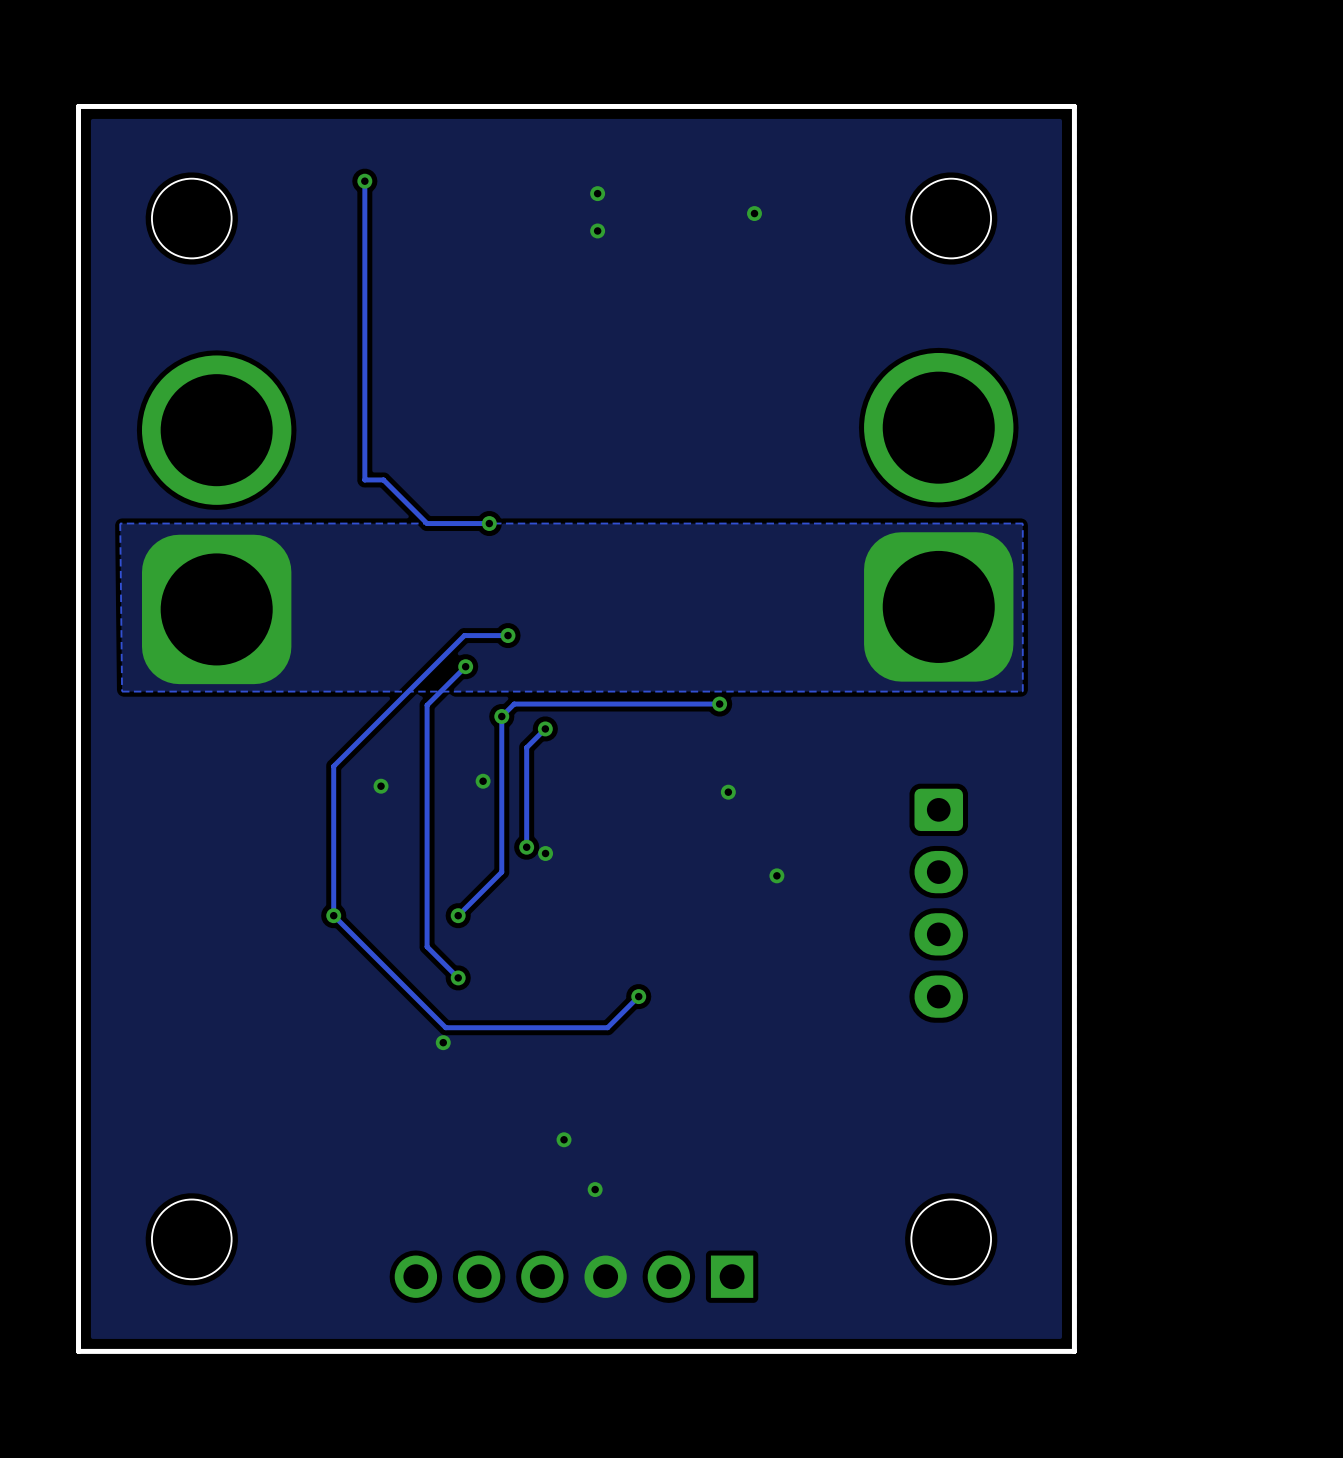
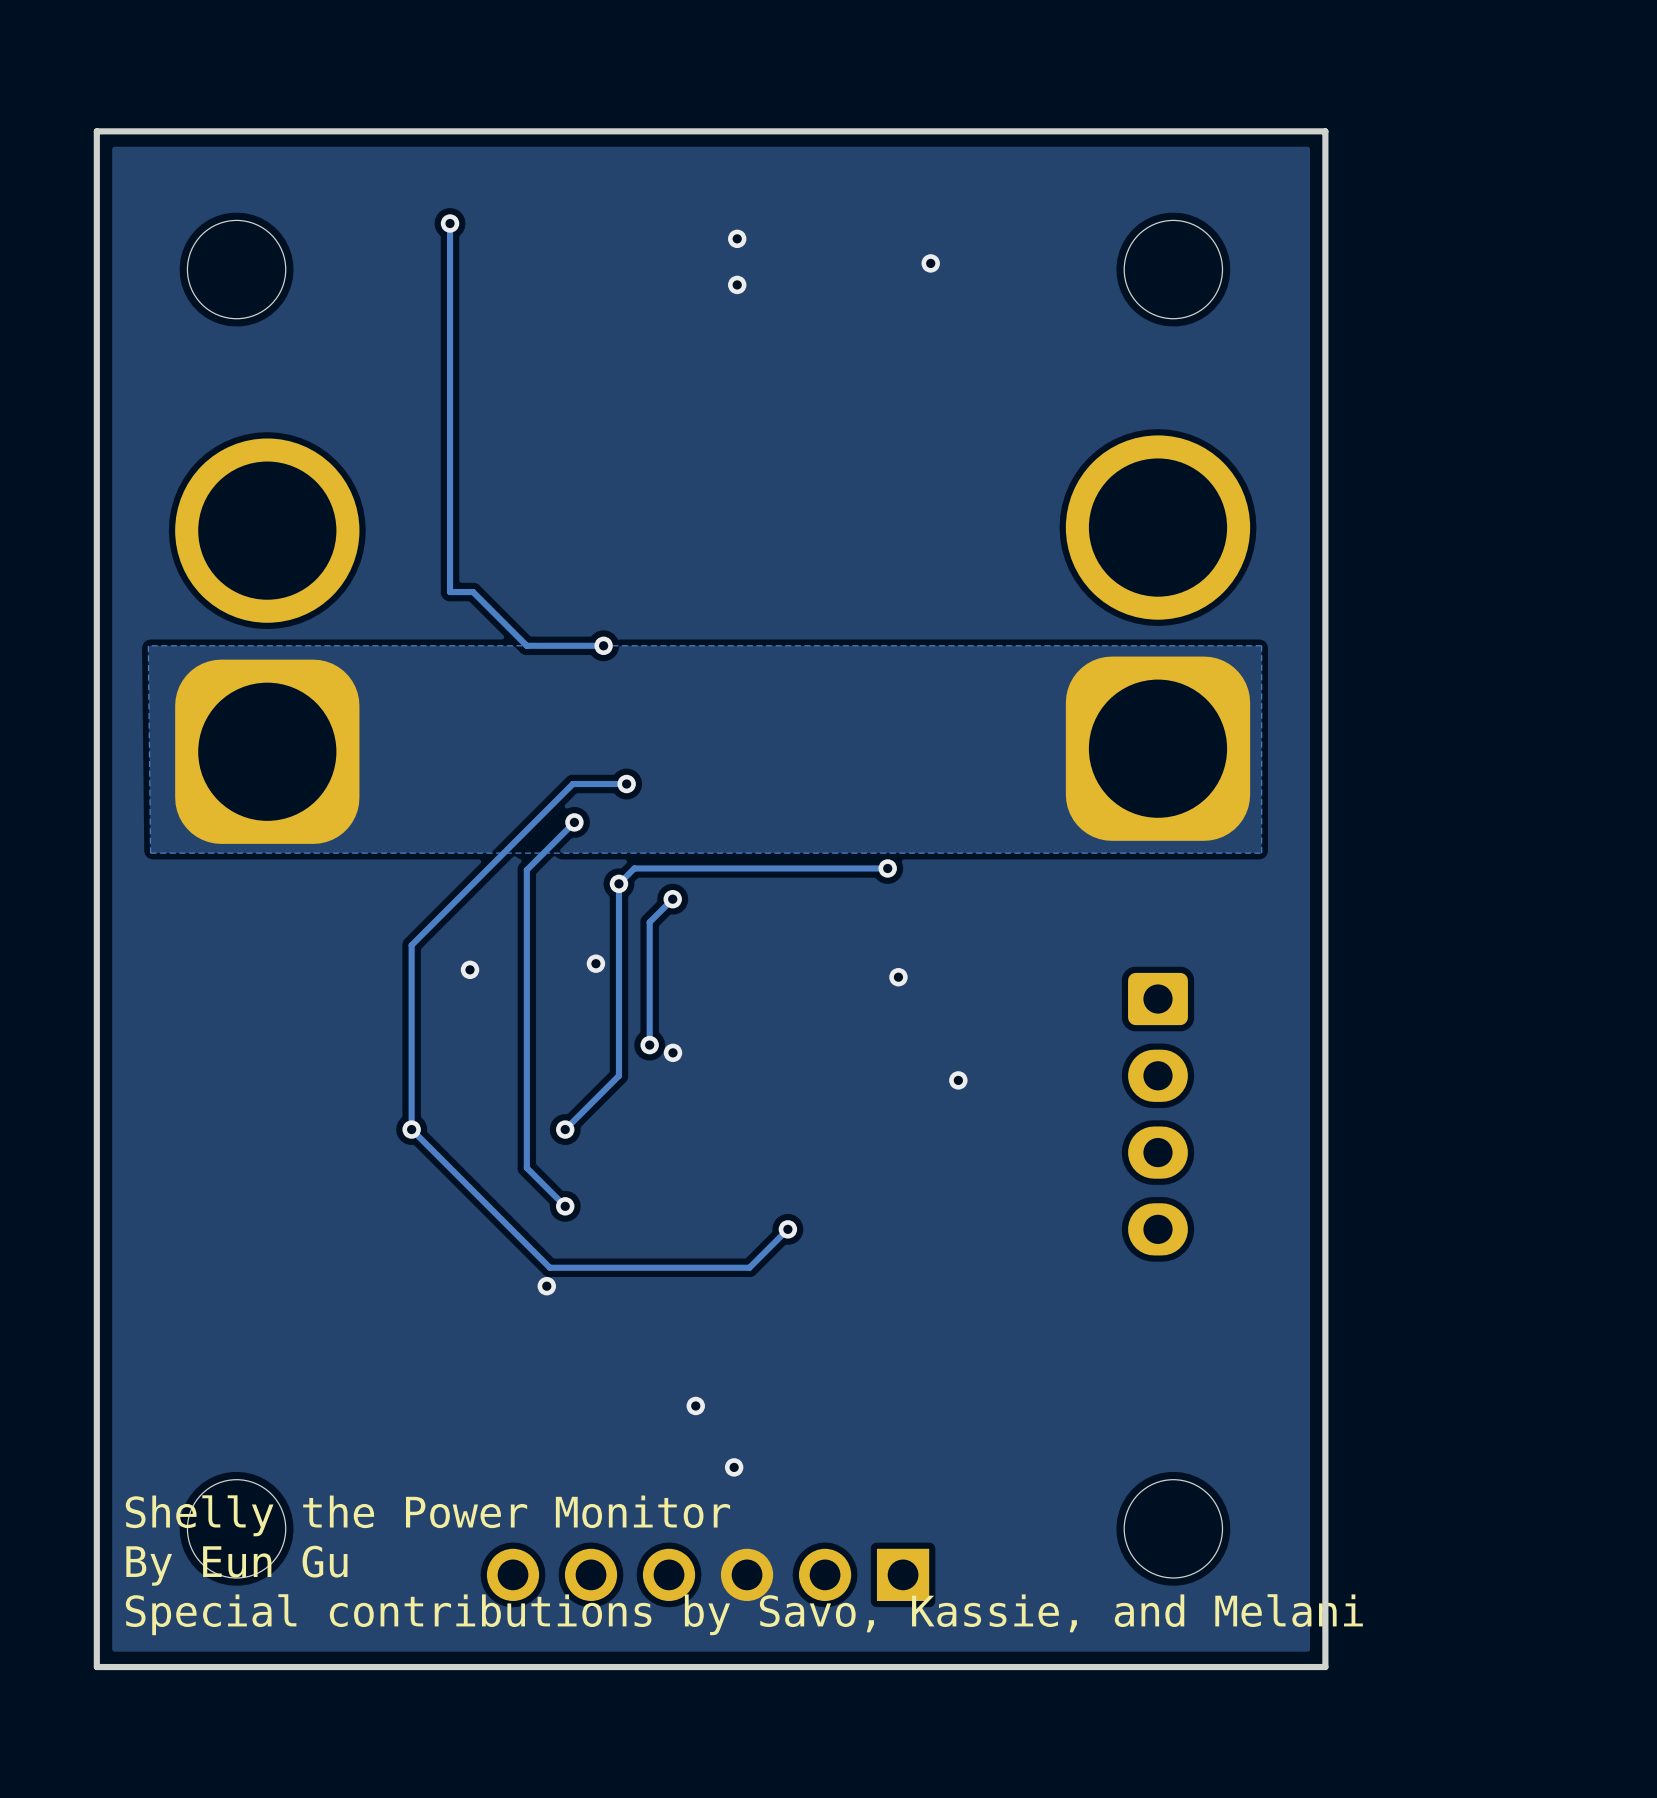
text: none -> Shelly the Power Monitor (427, 1515)
text: none -> By Eun Gu (236, 1565)
text: none -> Special contributions by Savo, Kassie, and Melani (744, 1614)

